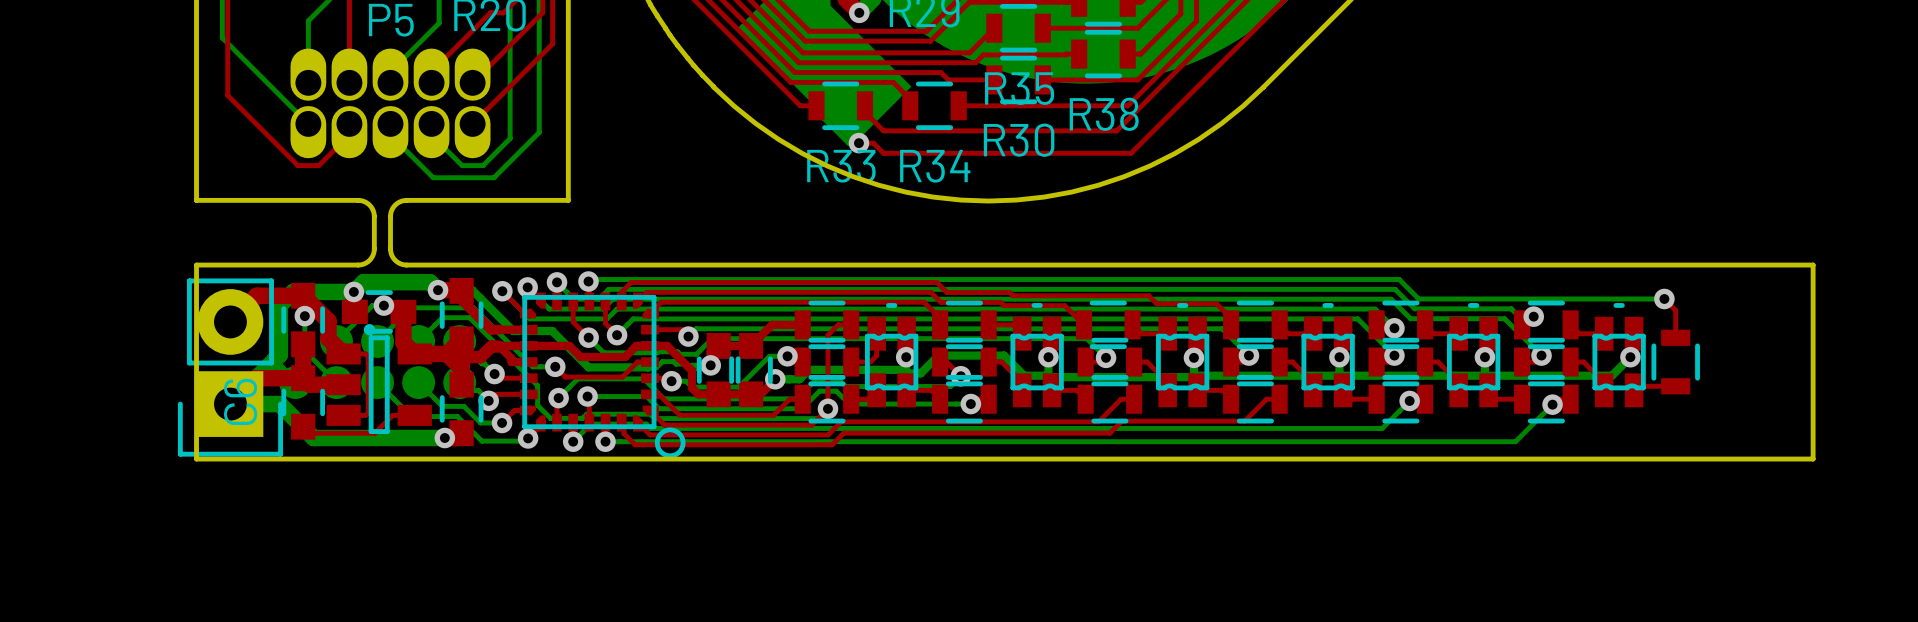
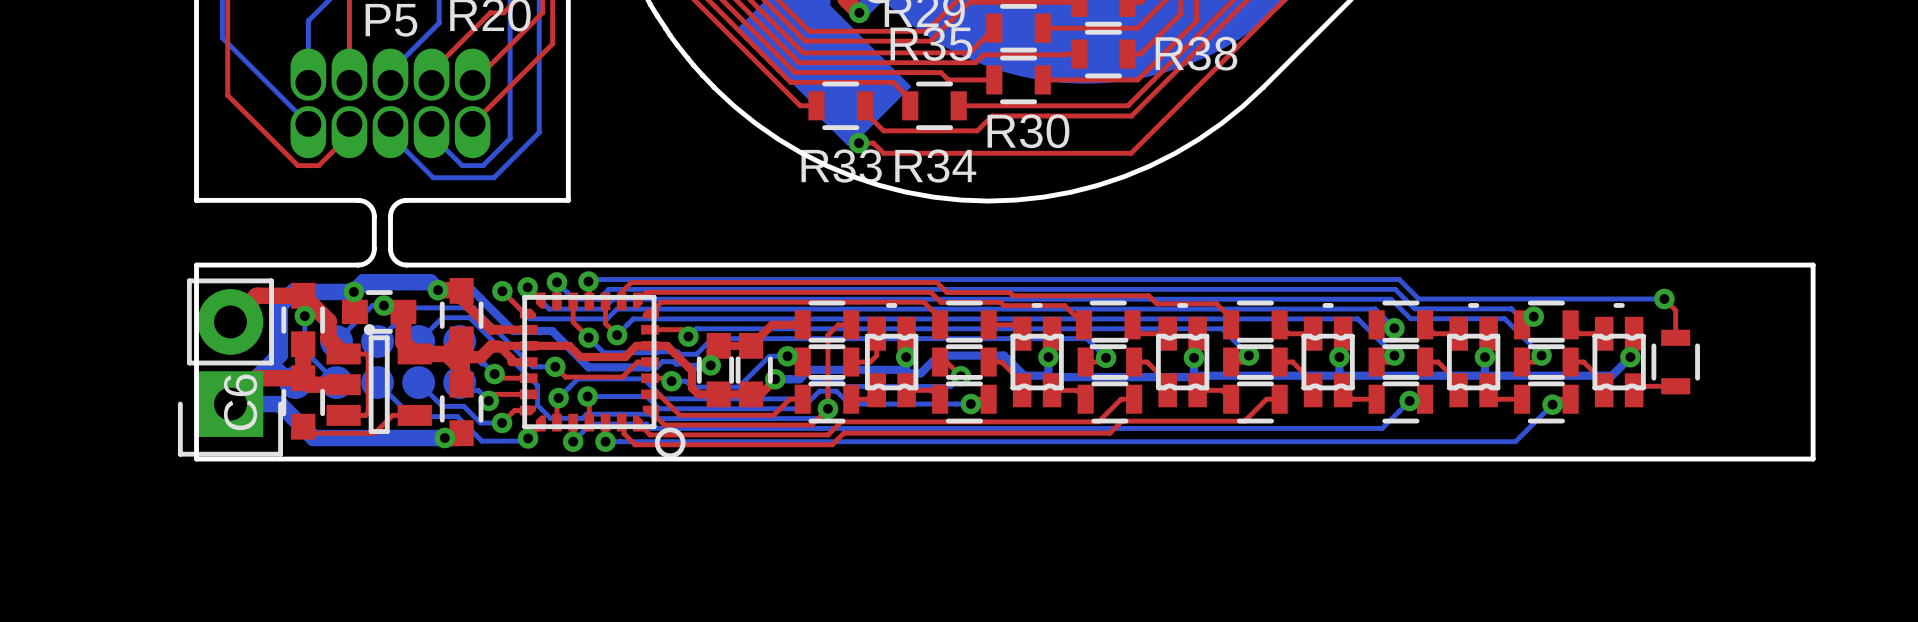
R35 name position: R35 (1019, 88) -> R35 (931, 43)
R38 name position: R38 (1104, 114) -> R38 (1196, 53)
top track: (1131, 115) (1116, 130) (977, 130) -> (1131, 115) (992, 115) (977, 130)
R30 name position: R30 (1019, 140) -> R30 (1028, 131)

